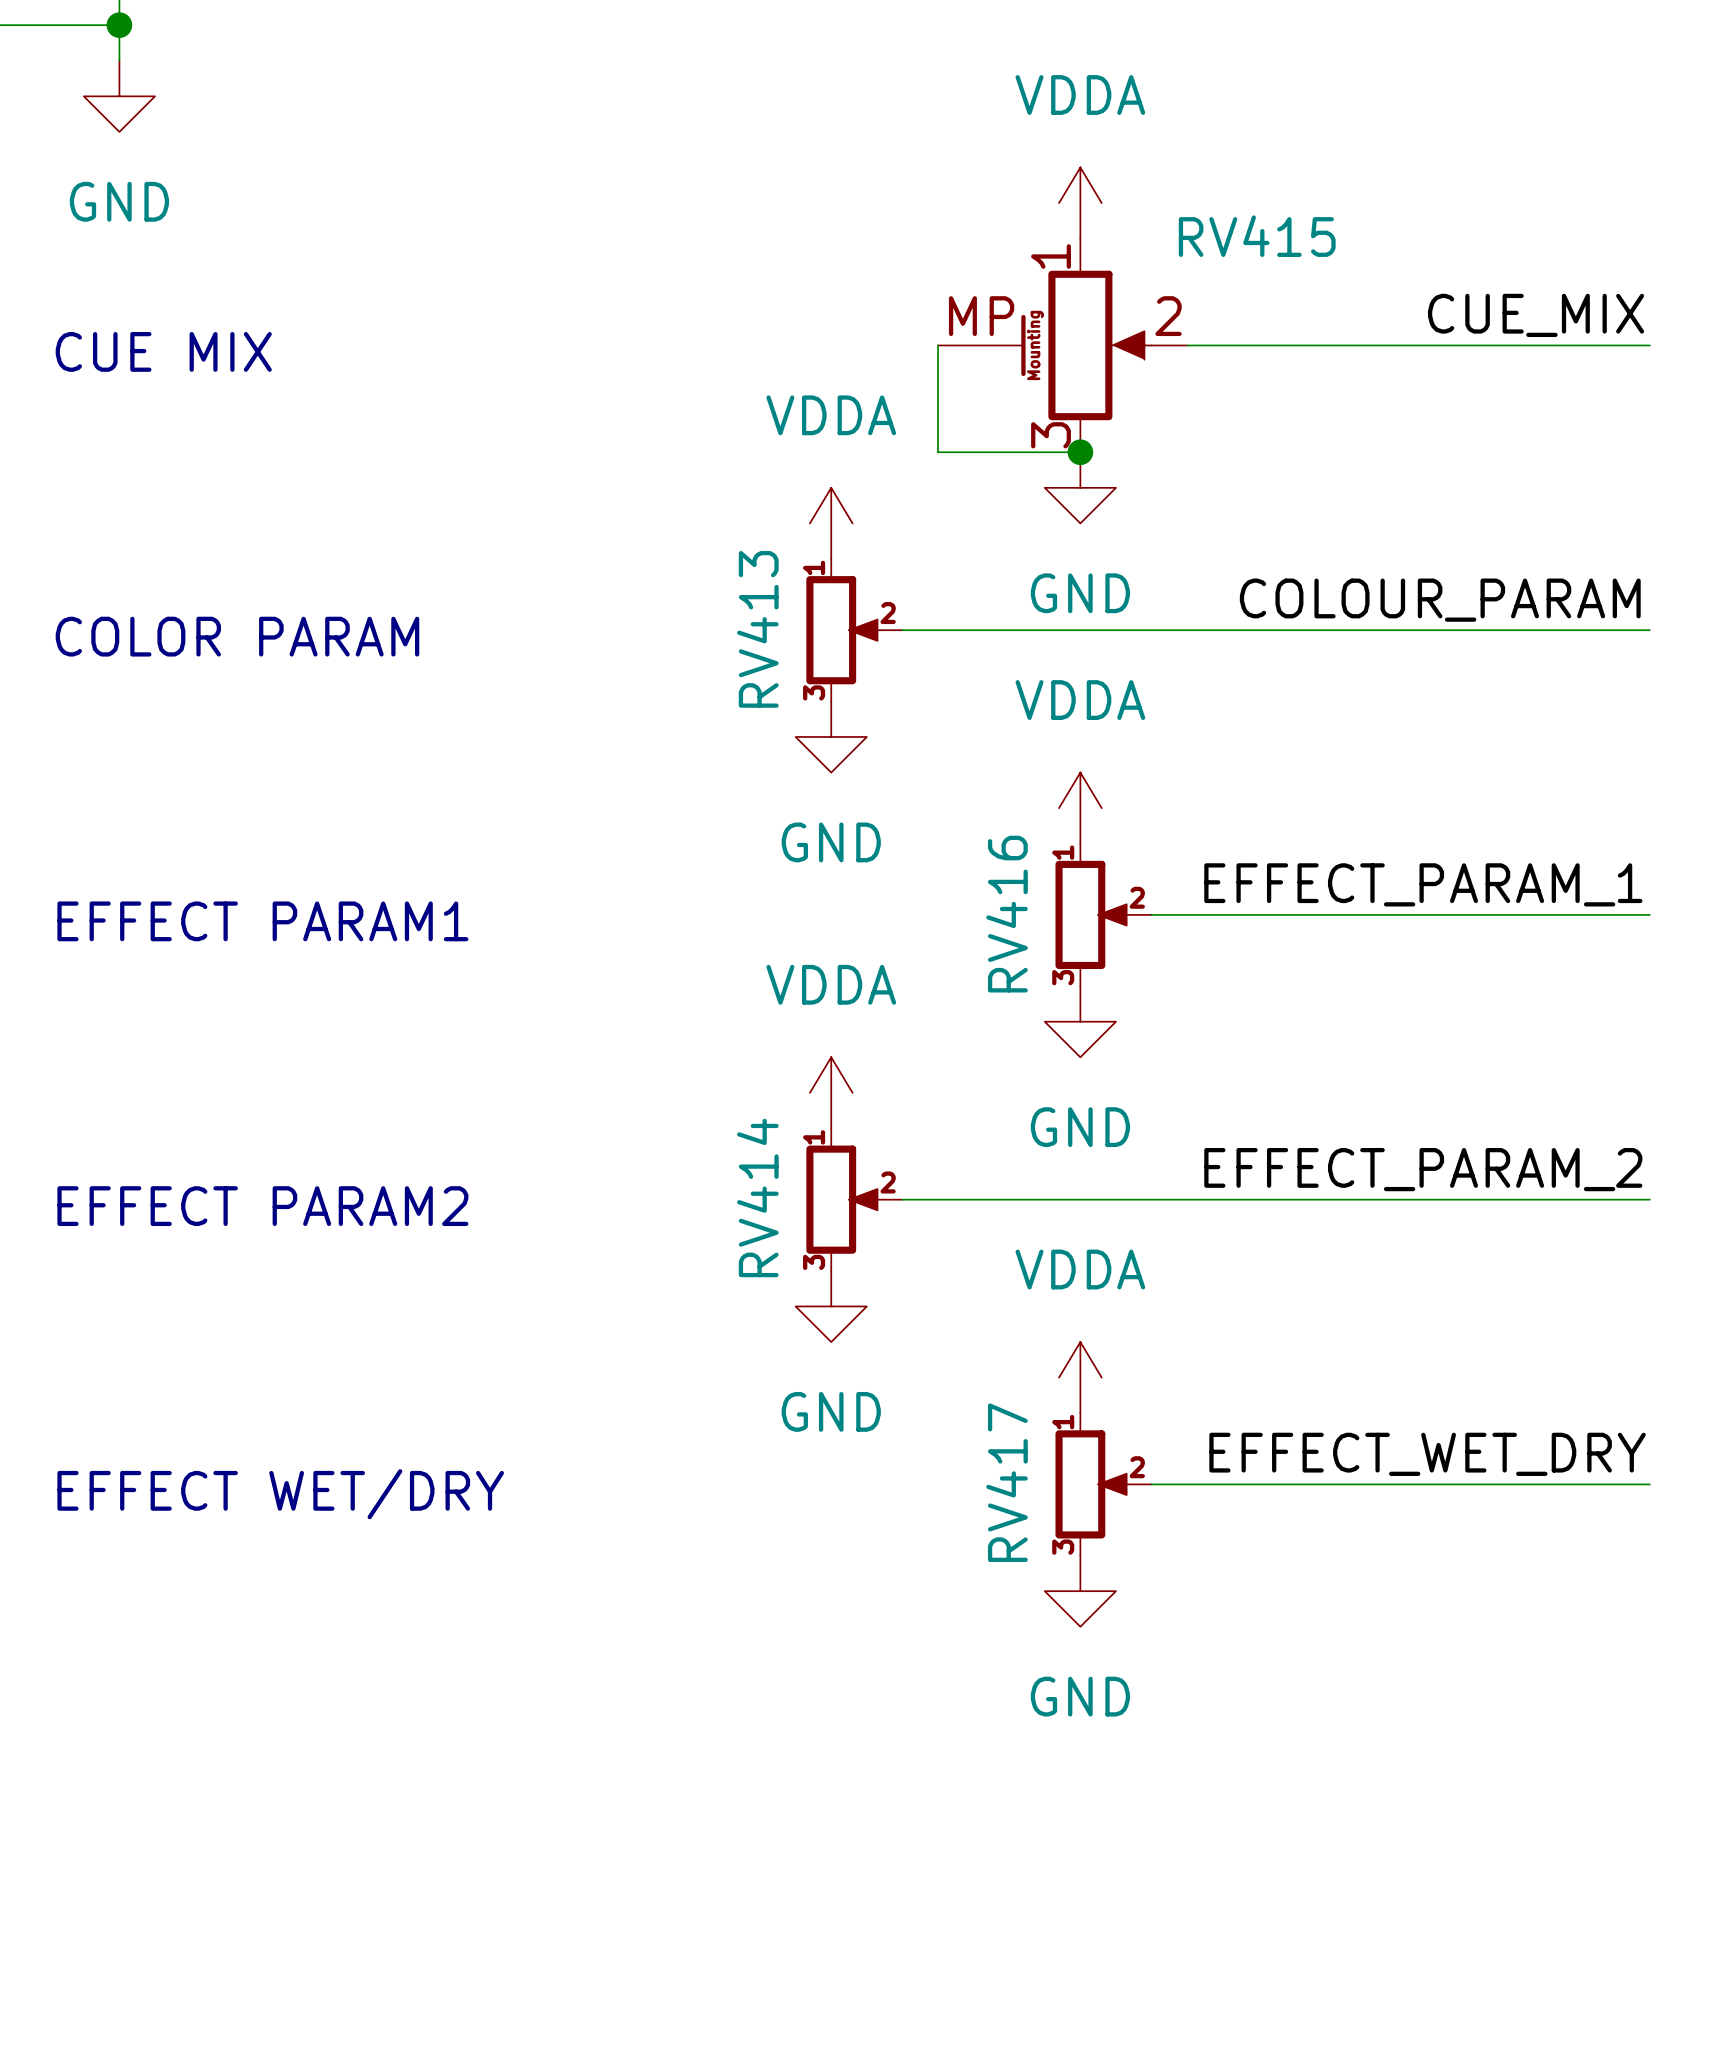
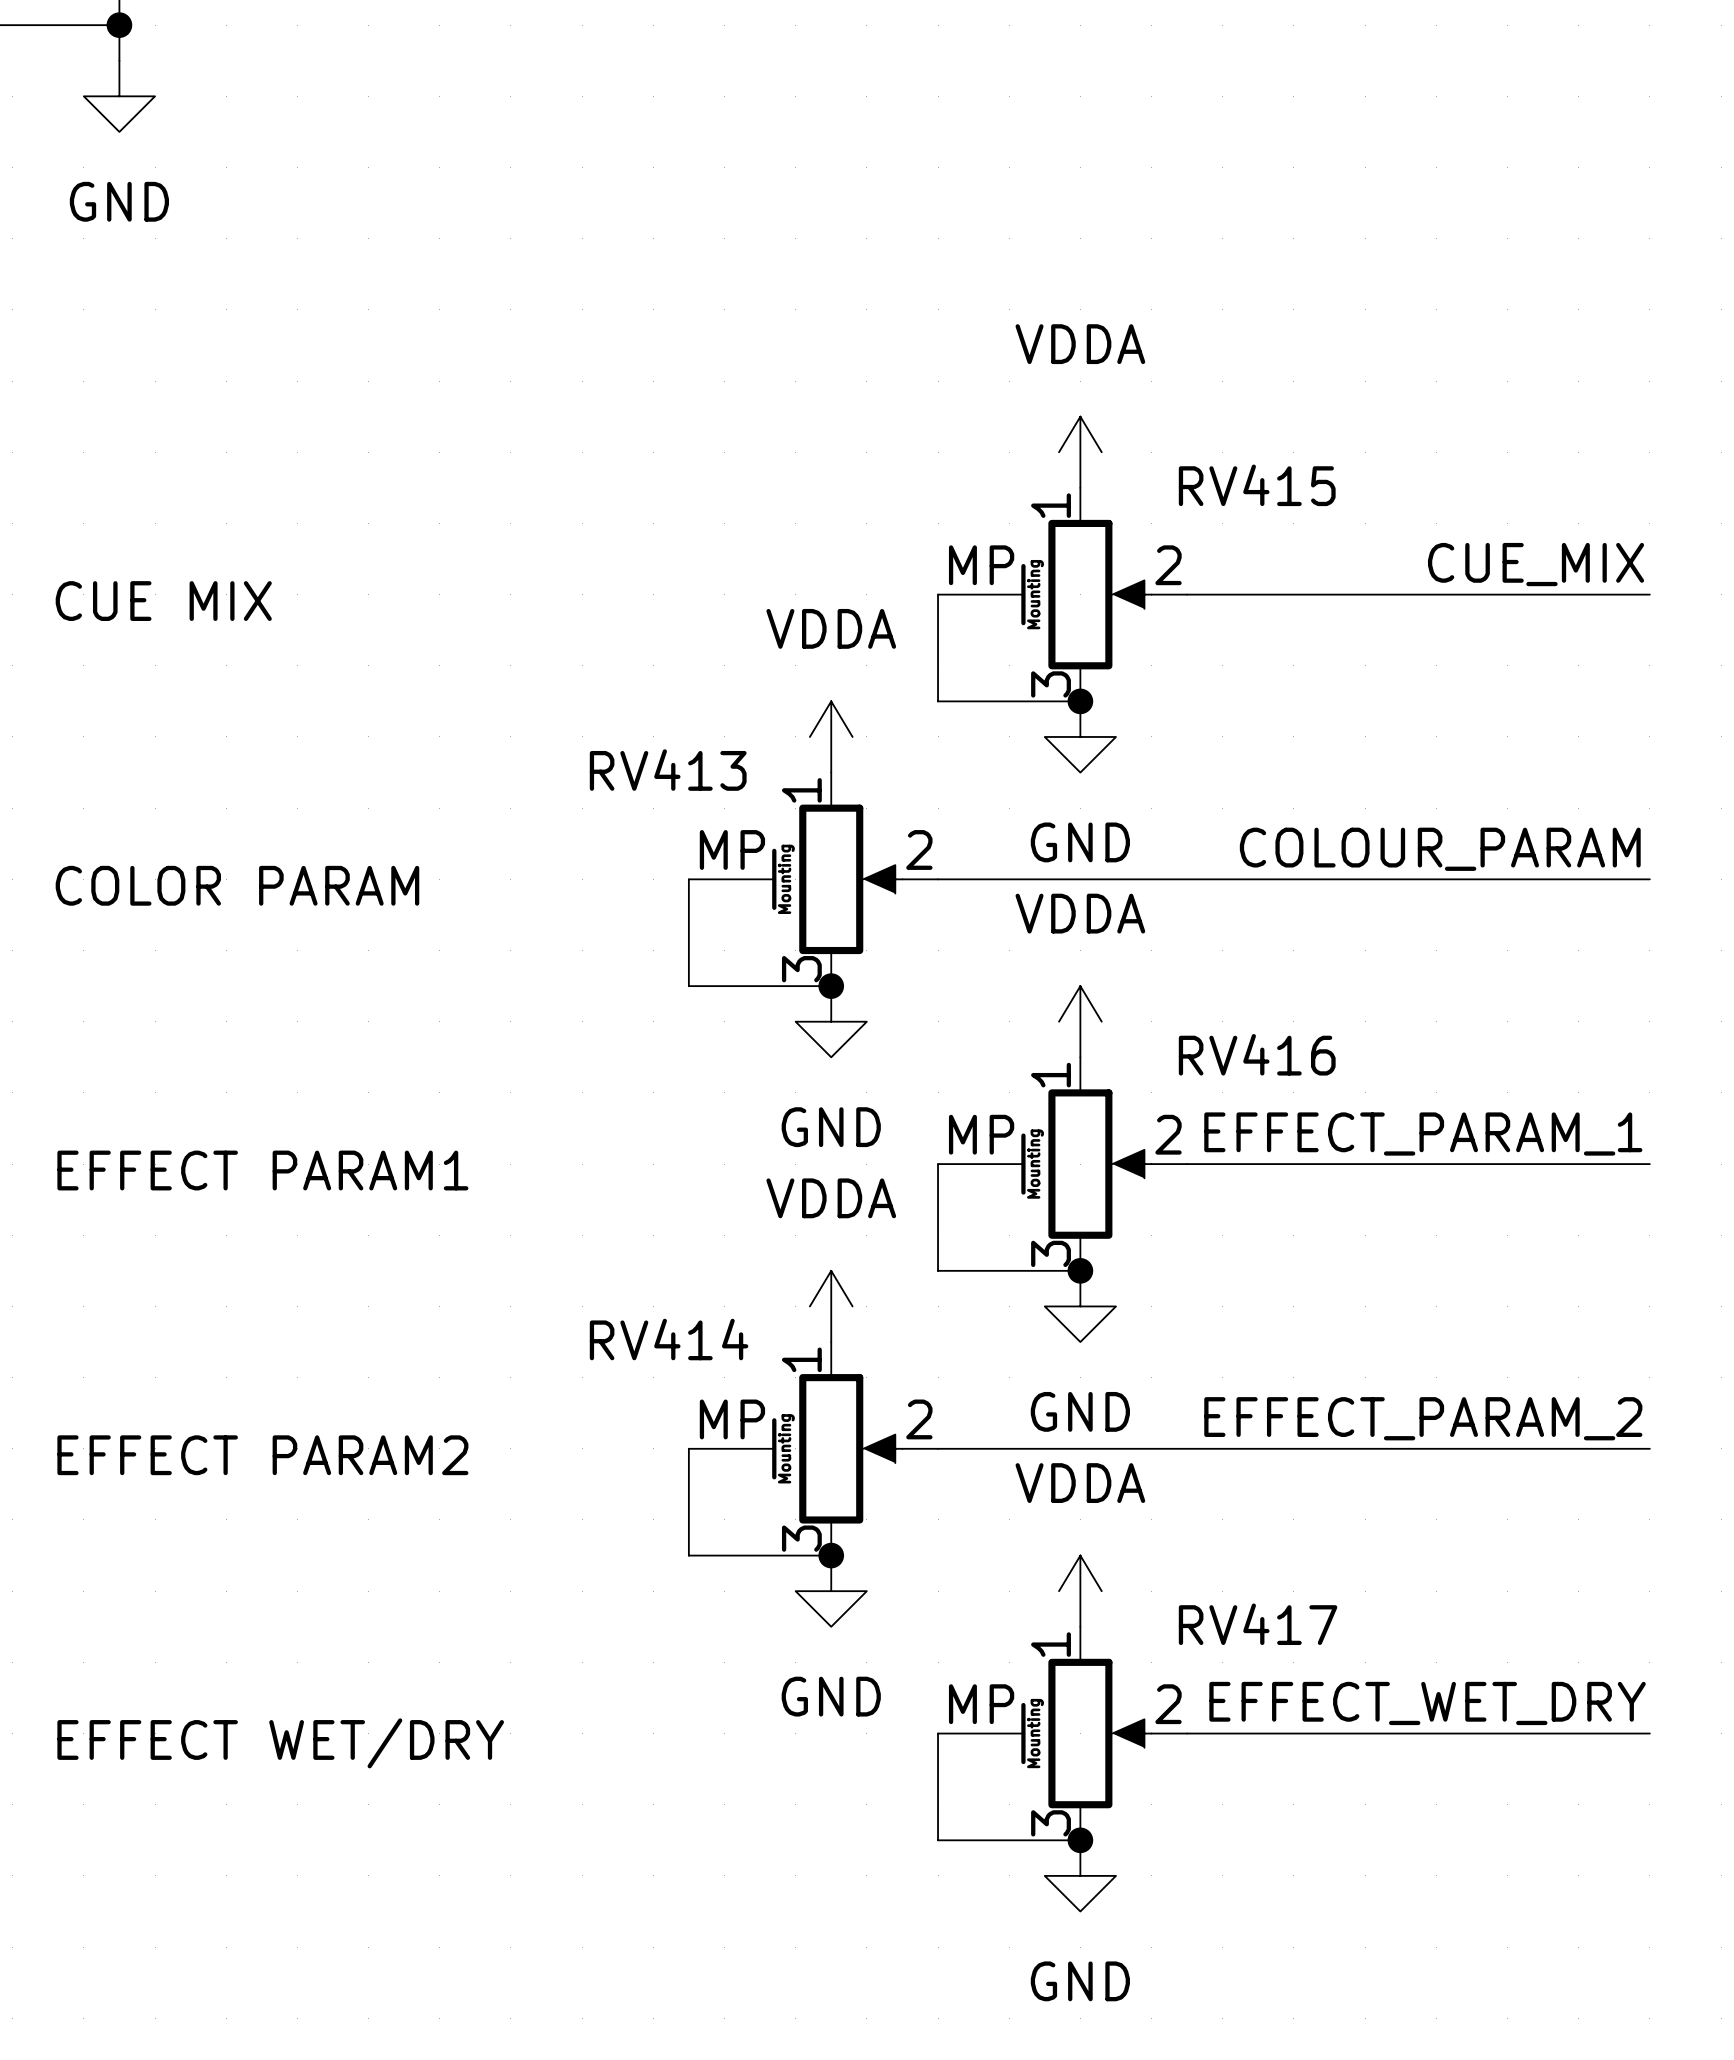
power symbol: VDDA (1080, 203) -> none
label position: CUE_MIX (1536, 315) -> CUE_MIX (1536, 564)
wire: (938, 345) (938, 452) (1080, 452) -> (938, 594) (938, 701) (1080, 701)
RV415 position: (1062, 345) -> (1062, 594)
wire: (1187, 345) (1649, 345) -> (1187, 594) (1649, 594)
text position: CUE MIX (163, 351) -> CUE MIX (163, 601)
junction: (1080, 452) -> none
power symbol: none -> VDDA (1080, 452)
power symbol position: GND (1080, 487) -> GND (1080, 736)
power symbol: VDDA (831, 523) -> none
RV413 symbol: [806, 559, 903, 702] -> [688, 772, 939, 987]
label position: COLOUR_PARAM (1440, 600) -> COLOUR_PARAM (1440, 849)
RV413 name position: RV413 (757, 629) -> RV413 (668, 770)
wire: (902, 630) (1649, 630) -> none
text position: COLOR PARAM (237, 636) -> COLOR PARAM (237, 885)
junction: none -> (1080, 701)
power symbol: GND (831, 736) -> VDDA (831, 736)
power symbol: VDDA (1080, 808) -> none
RV416 symbol: [1055, 843, 1152, 987] -> [938, 1057, 1188, 1271]
wire: none -> (688, 879) (688, 986) (831, 986)
wire: none -> (938, 879) (1649, 879)
label position: EFFECT_PARAM_1 (1423, 884) -> EFFECT_PARAM_1 (1423, 1134)
RV416 name position: RV416 (1007, 914) -> RV416 (1257, 1054)
wire: (1151, 914) (1649, 914) -> none
text position: EFFECT PARAM1 (262, 921) -> EFFECT PARAM1 (262, 1170)
junction: none -> (831, 986)
power symbol: none -> GND (831, 1021)
power symbol: GND (1080, 1021) -> VDDA (1080, 1021)
power symbol: VDDA (831, 1092) -> none
RV414 symbol: [806, 1128, 903, 1271] -> [688, 1342, 939, 1556]
wire: none -> (938, 1164) (938, 1270) (1080, 1270)
wire: none -> (1187, 1164) (1649, 1164)
label position: EFFECT_PARAM_2 (1423, 1169) -> EFFECT_PARAM_2 (1423, 1418)
RV414 name position: RV414 (757, 1197) -> RV414 (669, 1339)
wire: (902, 1199) (1649, 1199) -> none
text position: EFFECT PARAM2 (262, 1206) -> EFFECT PARAM2 (262, 1455)
junction: none -> (1080, 1270)
power symbol: GND (831, 1306) -> VDDA (831, 1306)
power symbol: none -> GND (1080, 1306)
power symbol: VDDA (1080, 1377) -> none
RV417 symbol: [1055, 1413, 1152, 1556] -> [938, 1626, 1188, 1841]
wire: none -> (688, 1448) (688, 1555) (831, 1555)
wire: none -> (938, 1448) (1649, 1448)
label position: EFFECT_WET_DRY (1427, 1454) -> EFFECT_WET_DRY (1427, 1703)
RV417 name position: RV417 (1007, 1482) -> RV417 (1258, 1624)
wire: (1151, 1484) (1649, 1484) -> none
text position: EFFECT WET/DRY (280, 1494) -> EFFECT WET/DRY (280, 1743)
junction: none -> (831, 1555)
power symbol: none -> GND (831, 1591)
power symbol: GND (1080, 1591) -> VDDA (1080, 1591)
wire: none -> (938, 1733) (938, 1840) (1080, 1840)
wire: none -> (1187, 1733) (1649, 1733)
junction: none -> (1080, 1840)
power symbol: none -> GND (1080, 1875)

